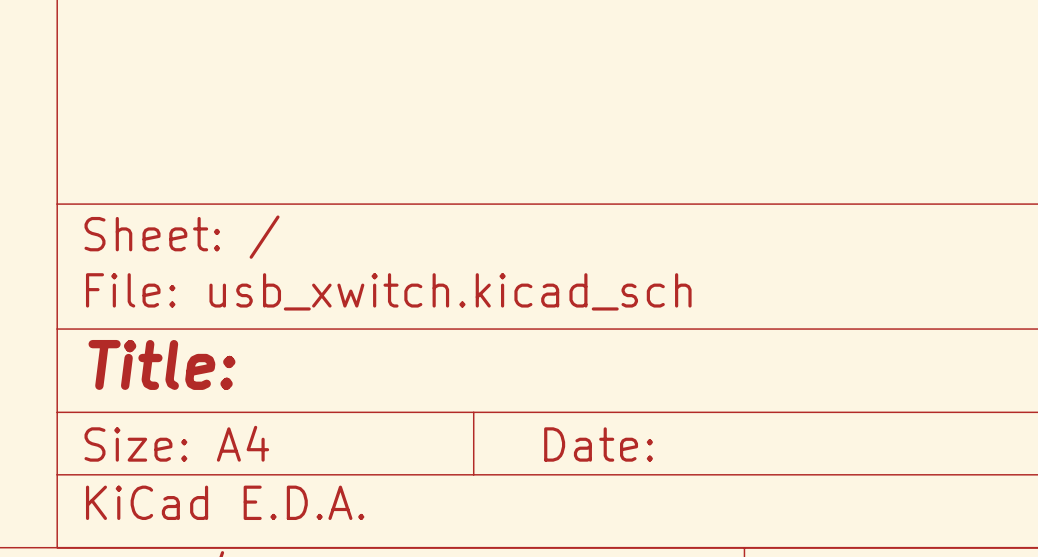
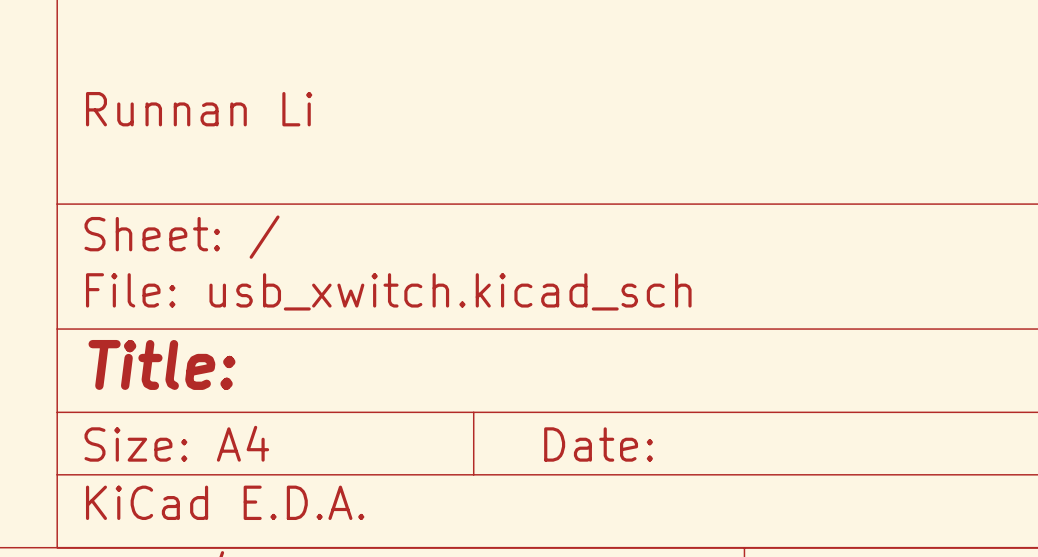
title block: none -> Runnan Li (199, 109)

